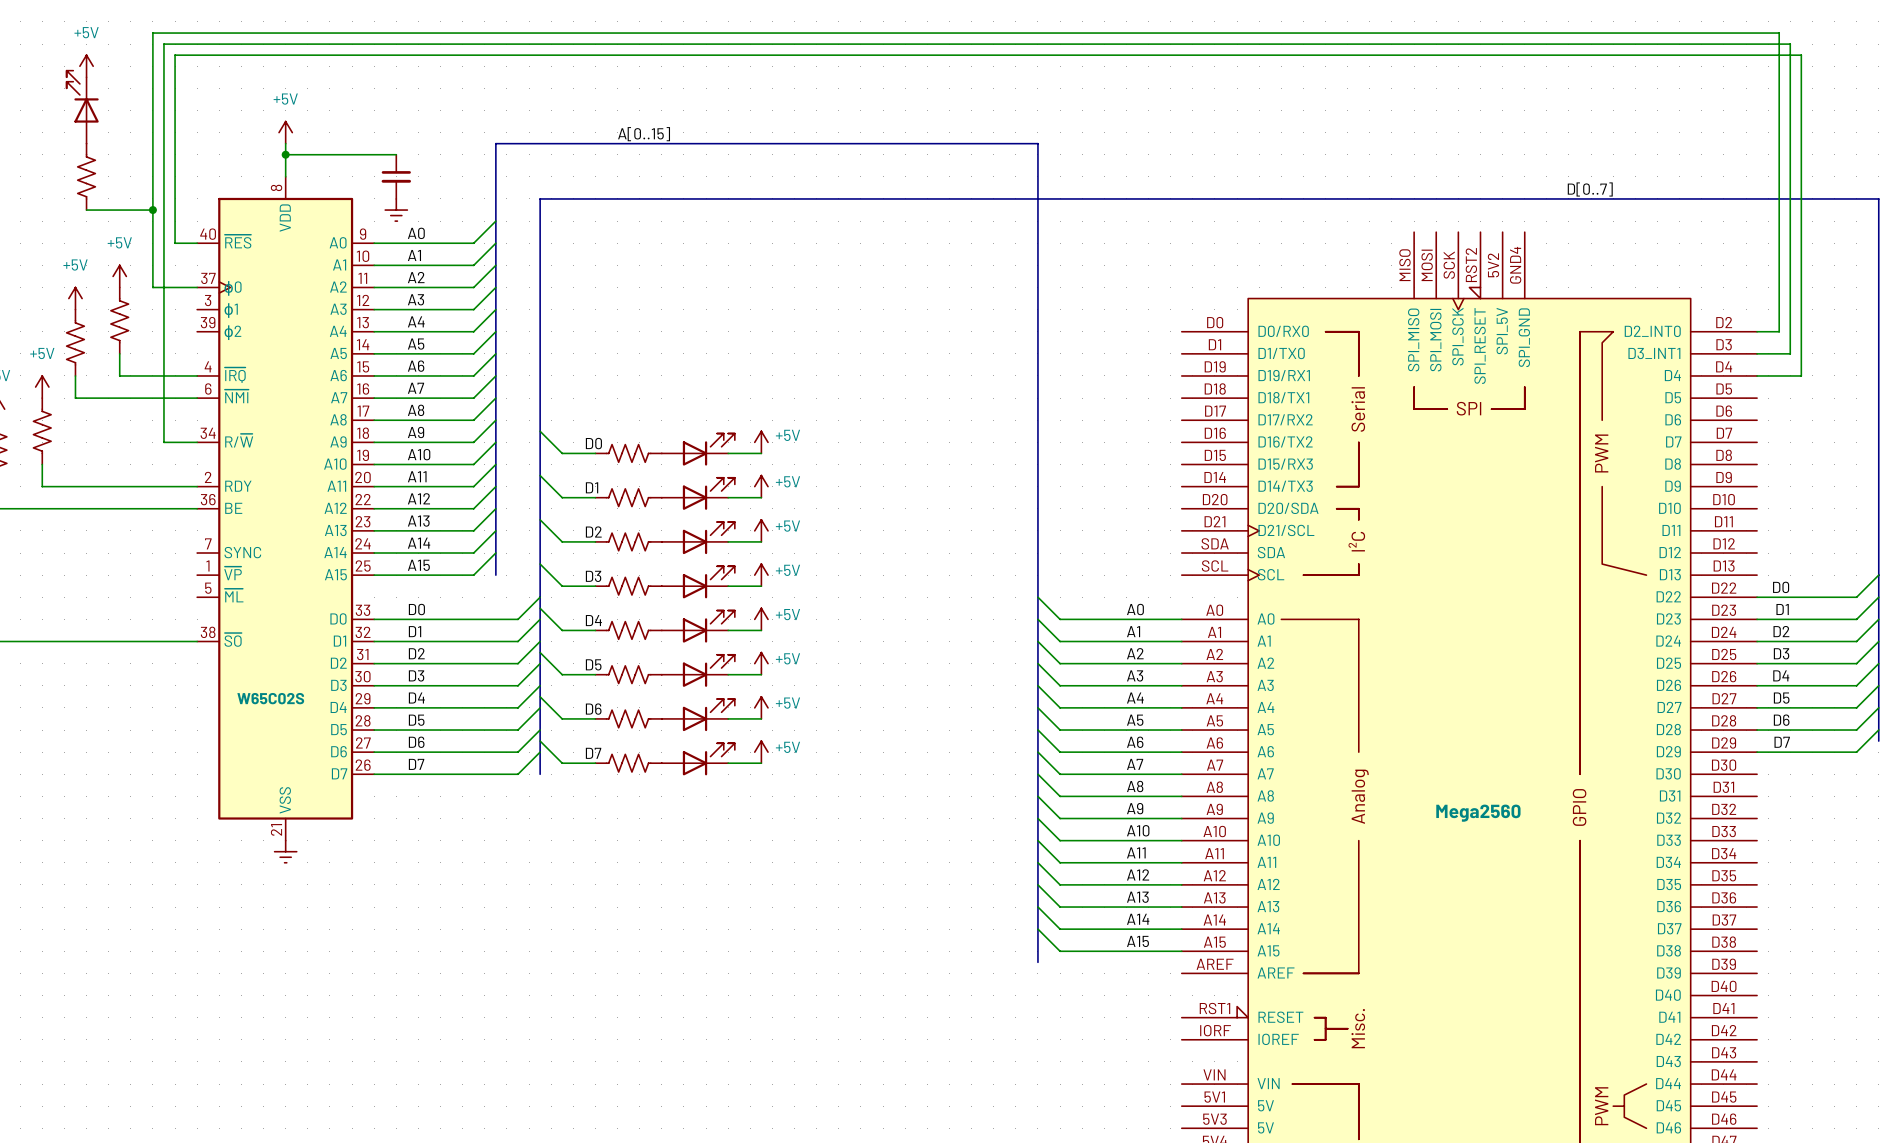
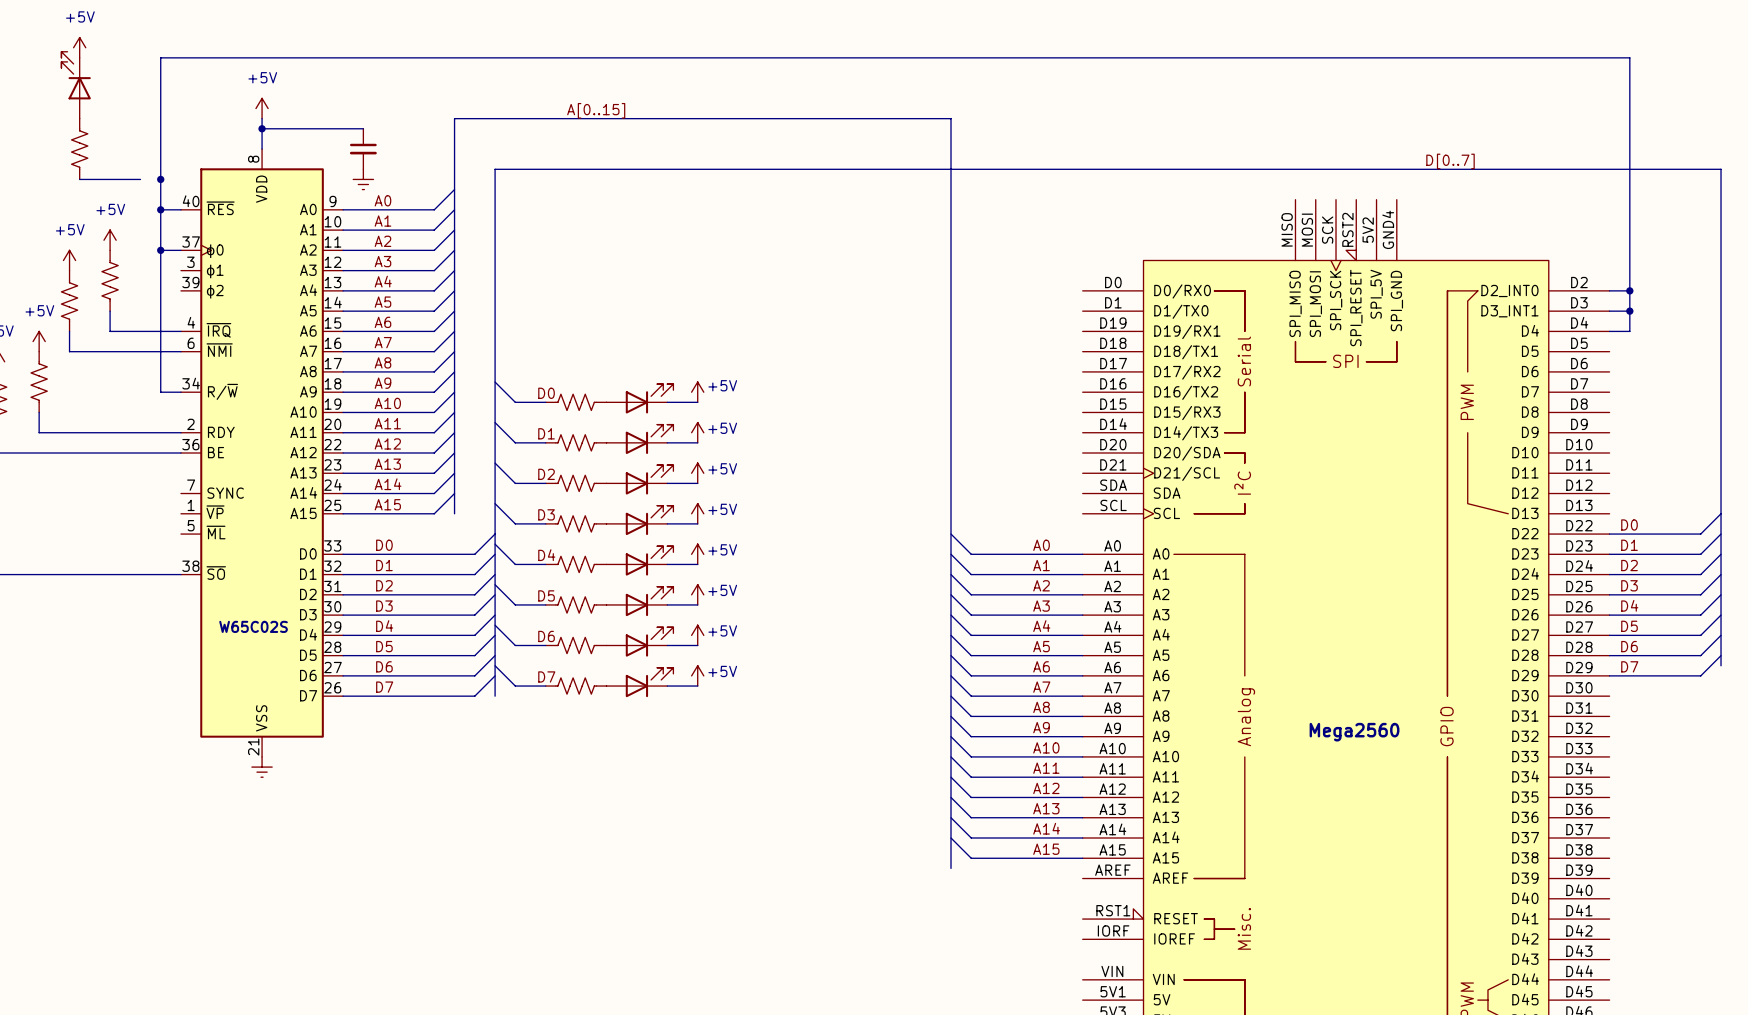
wire: (175, 77) (175, 55) (1801, 55) (1801, 375) (1779, 375) -> (1629, 290) (1629, 331)
wire: (1779, 77) (1779, 33) (152, 33) (152, 287) (175, 287) -> (1629, 57) (160, 57)
junction: (152, 210) -> none
junction: none -> (160, 179)
junction: none -> (160, 209)
junction: none -> (160, 250)
junction: none -> (1629, 290)
wire: (1779, 353) (1790, 353) (1790, 44) (163, 44) (163, 442) (175, 442) -> (160, 209) (160, 392)
junction: none -> (1629, 311)

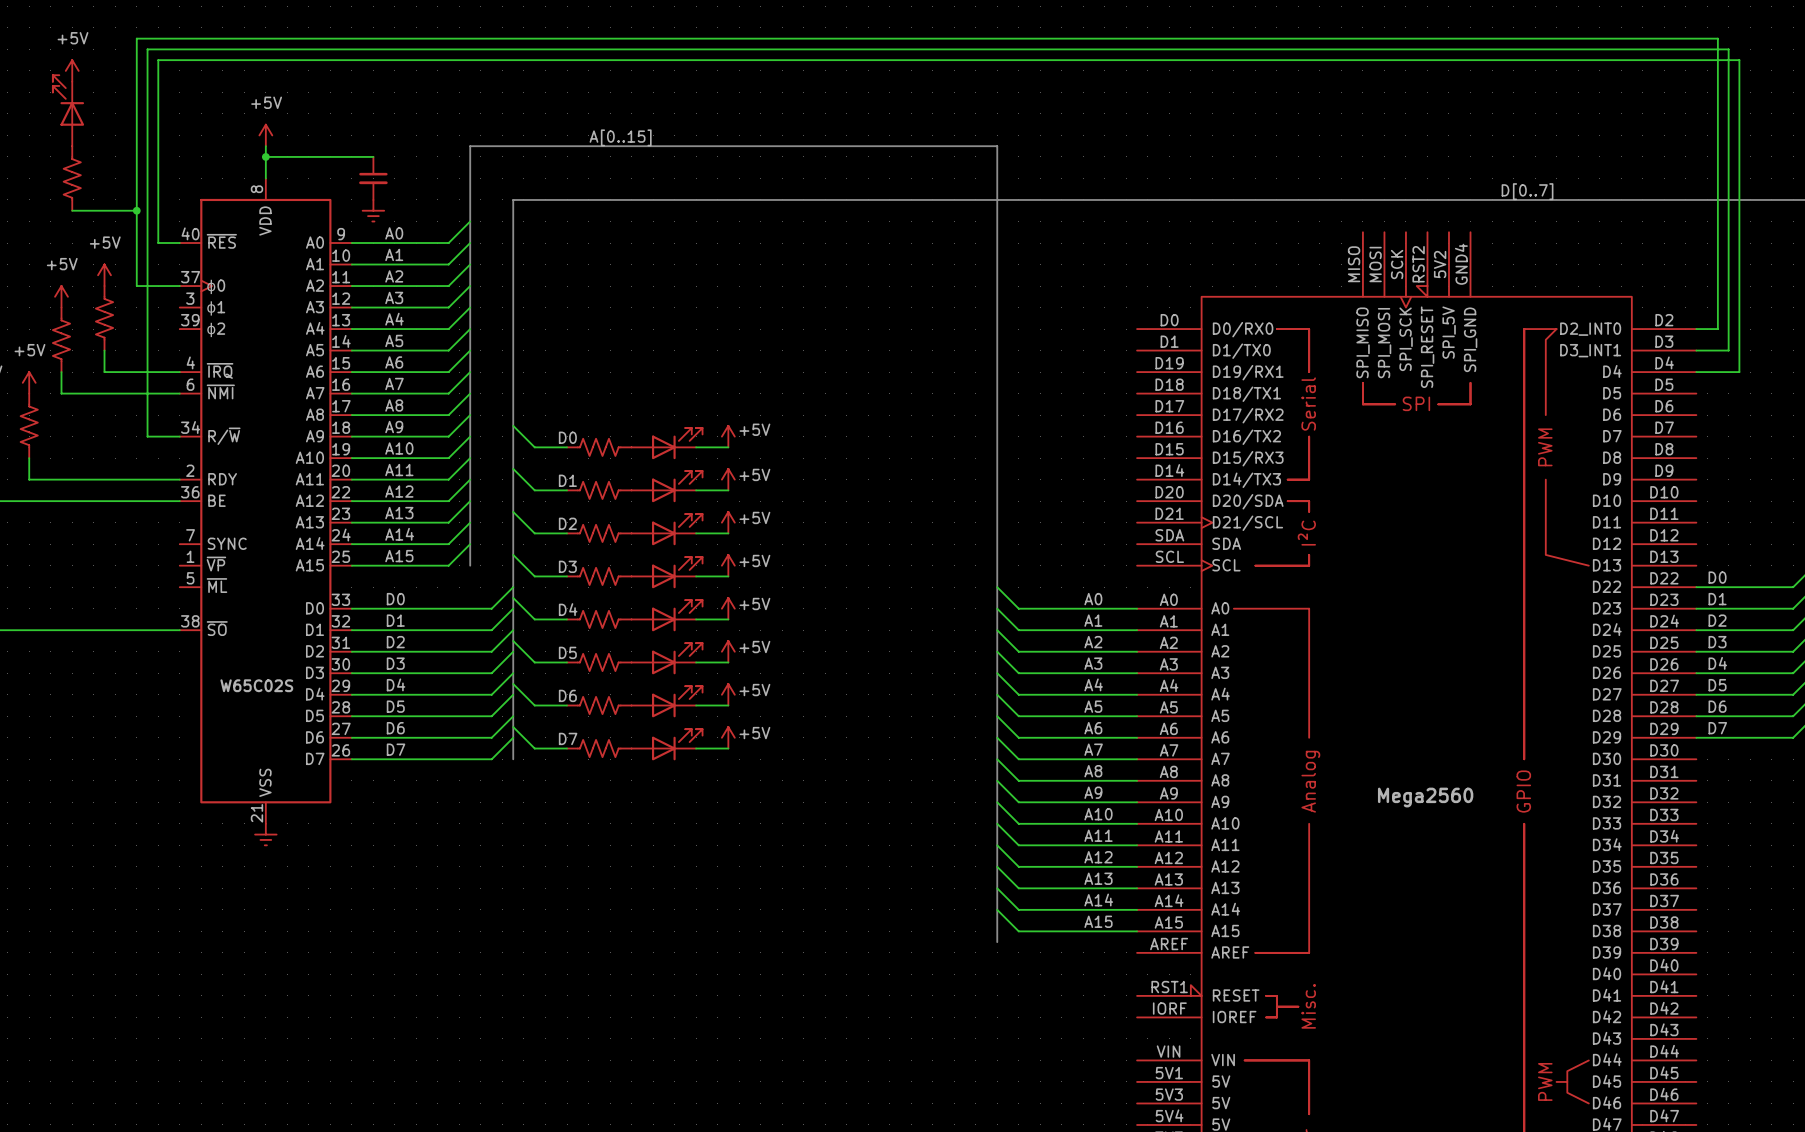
wire: (160, 57) (1629, 57) -> (158, 286) (136, 286) (136, 38) (1717, 38) (1717, 81)
junction: none -> (136, 210)
junction: (160, 179) -> none
wire: (160, 209) (160, 392) -> (1717, 350) (1728, 350) (1728, 49) (147, 49) (147, 436) (158, 436)
junction: (160, 209) -> none
junction: (160, 250) -> none
wire: (1629, 290) (1629, 331) -> (158, 81) (158, 60) (1739, 60) (1739, 372) (1717, 372)
junction: (1629, 290) -> none
junction: (1629, 311) -> none

